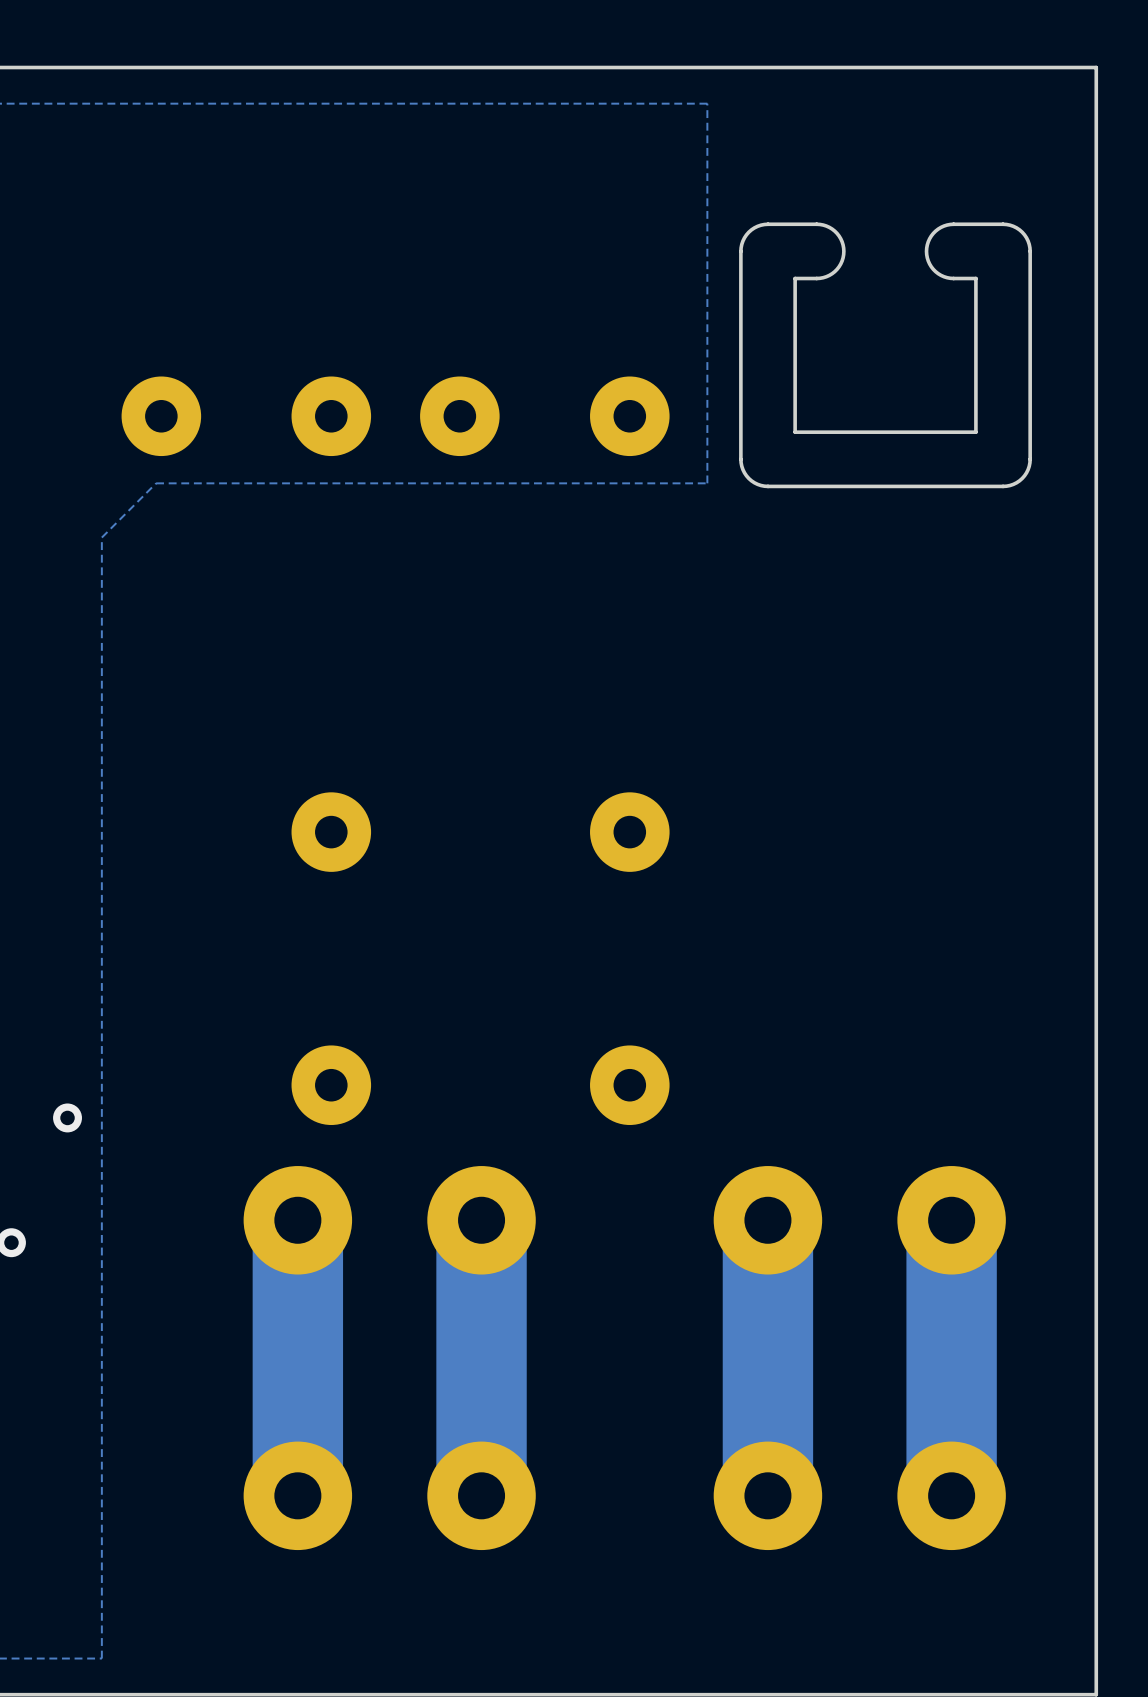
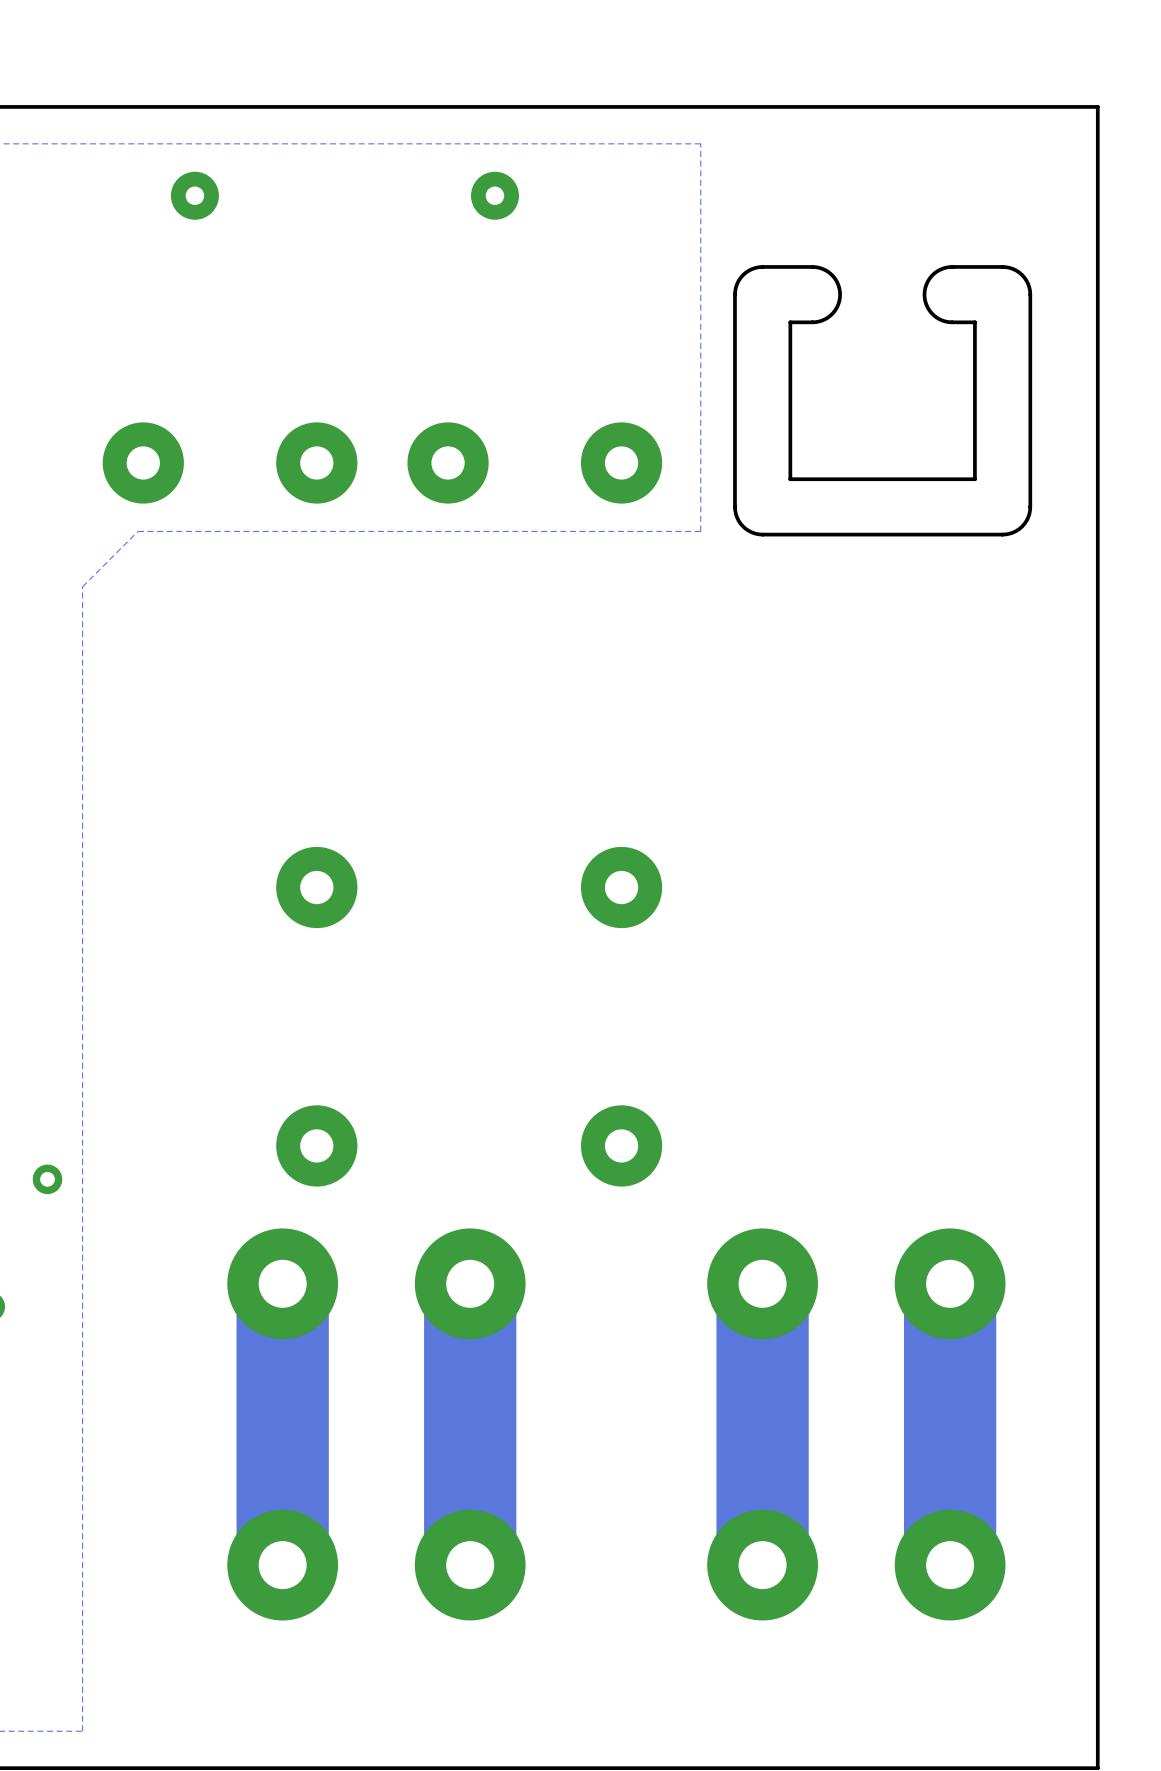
via: none -> (194, 195)
via: none -> (494, 195)

